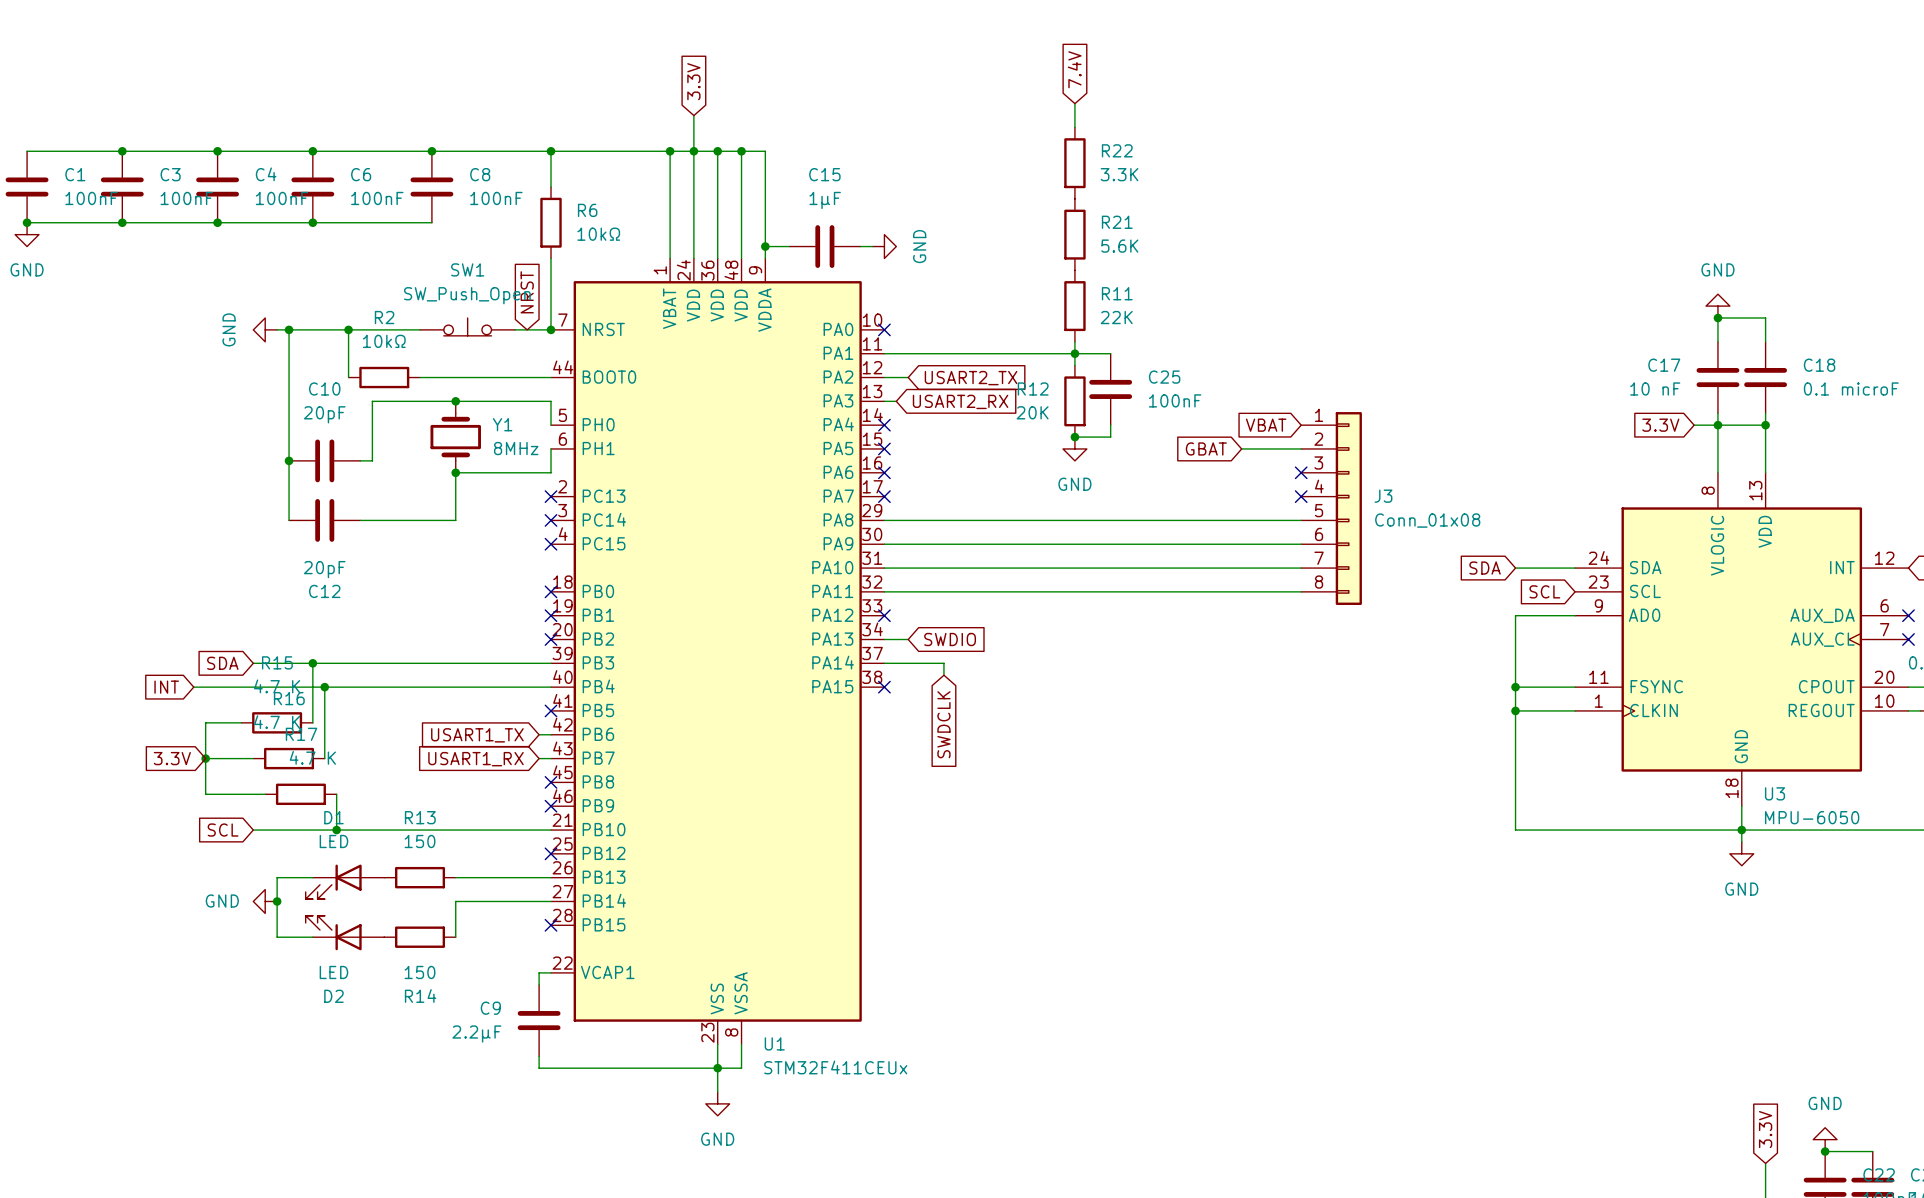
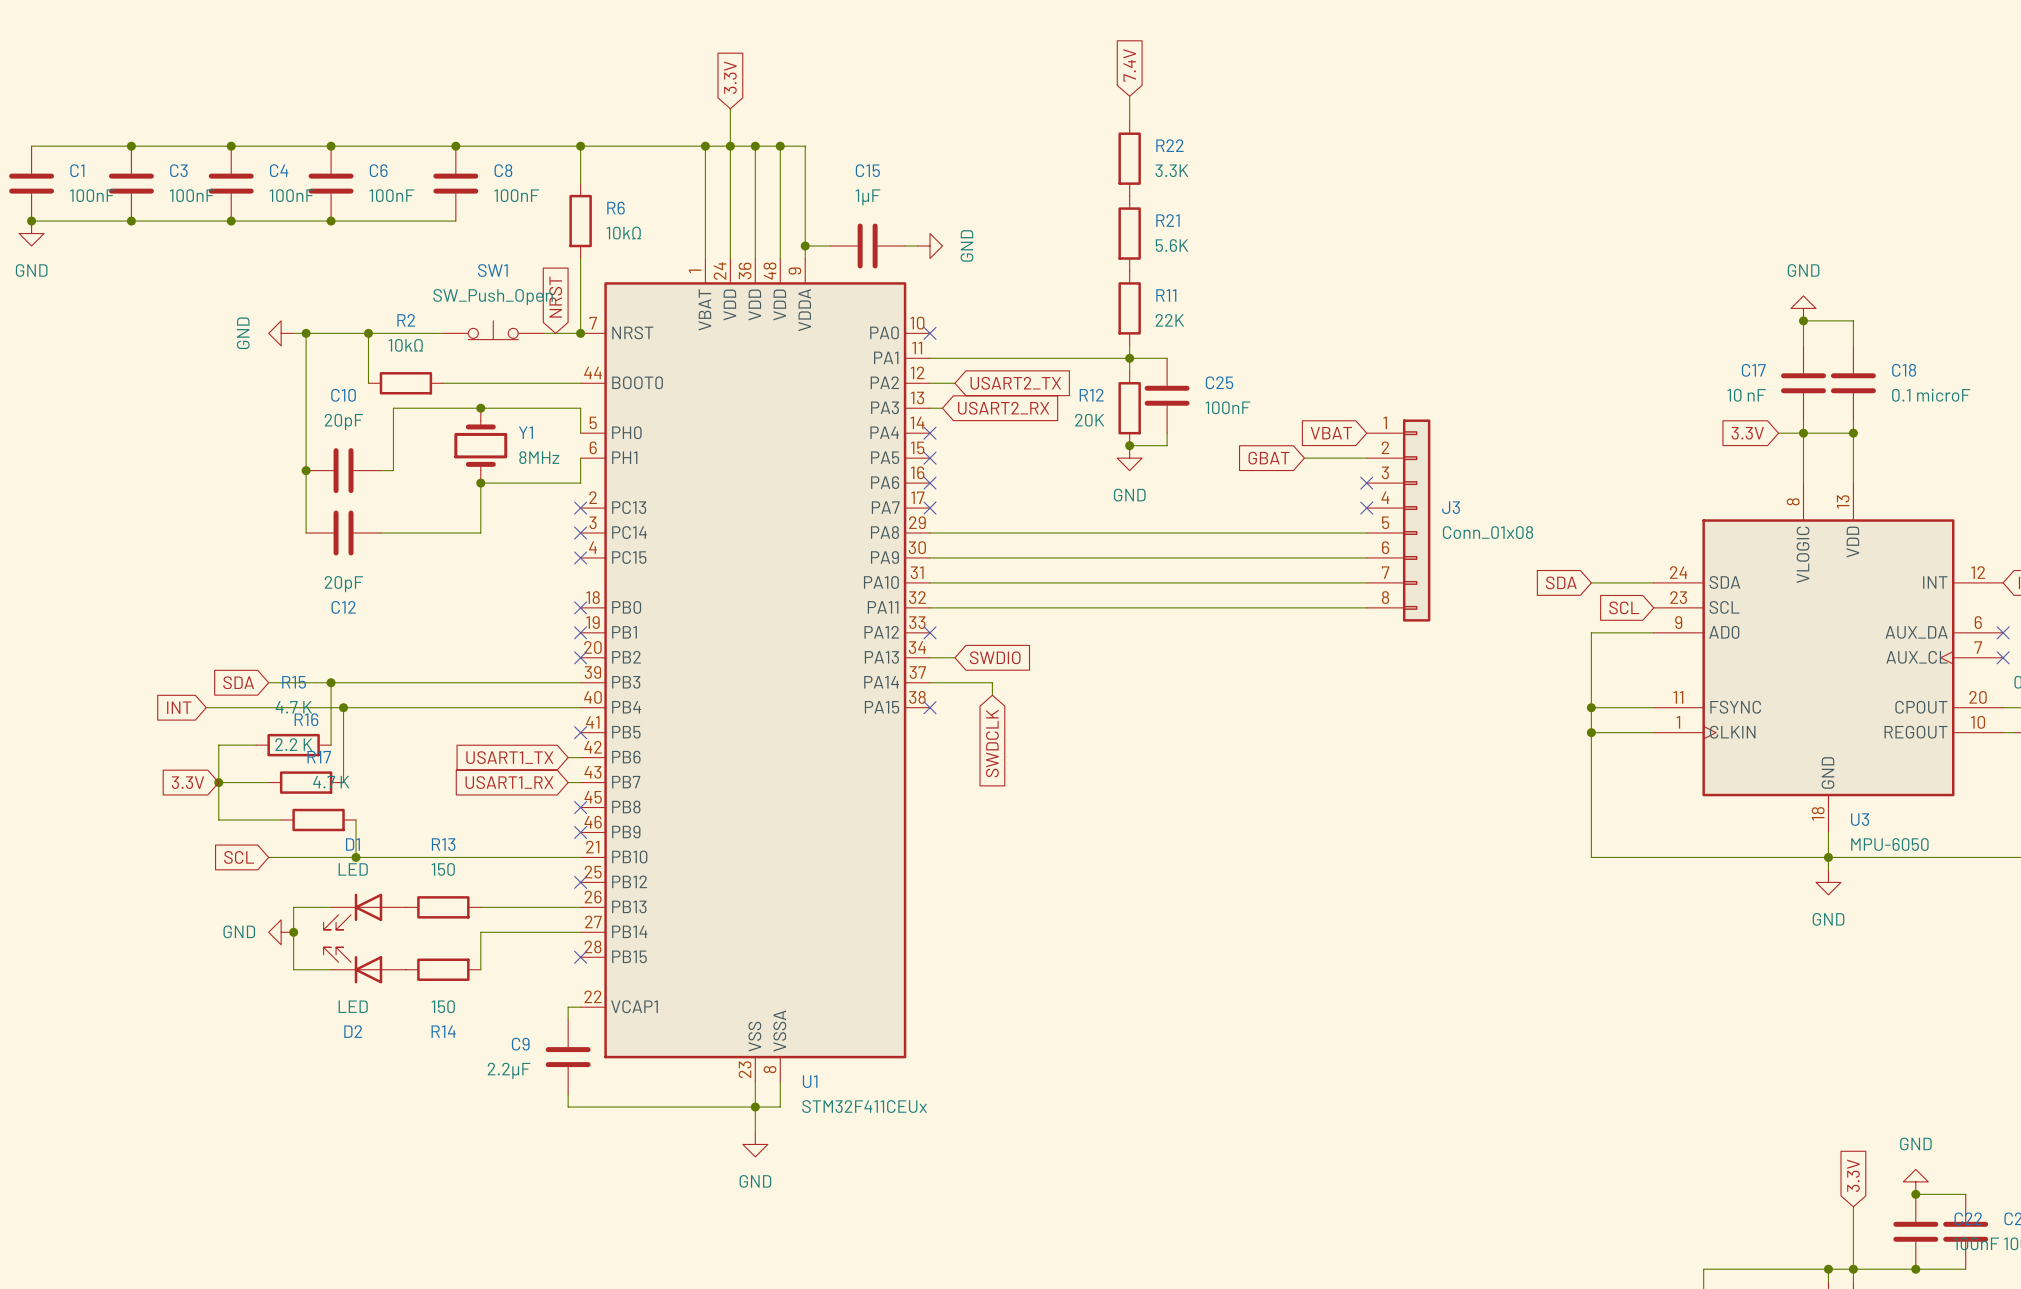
R16 value: 4.7 K (277, 722) -> 2.2 K (293, 744)

